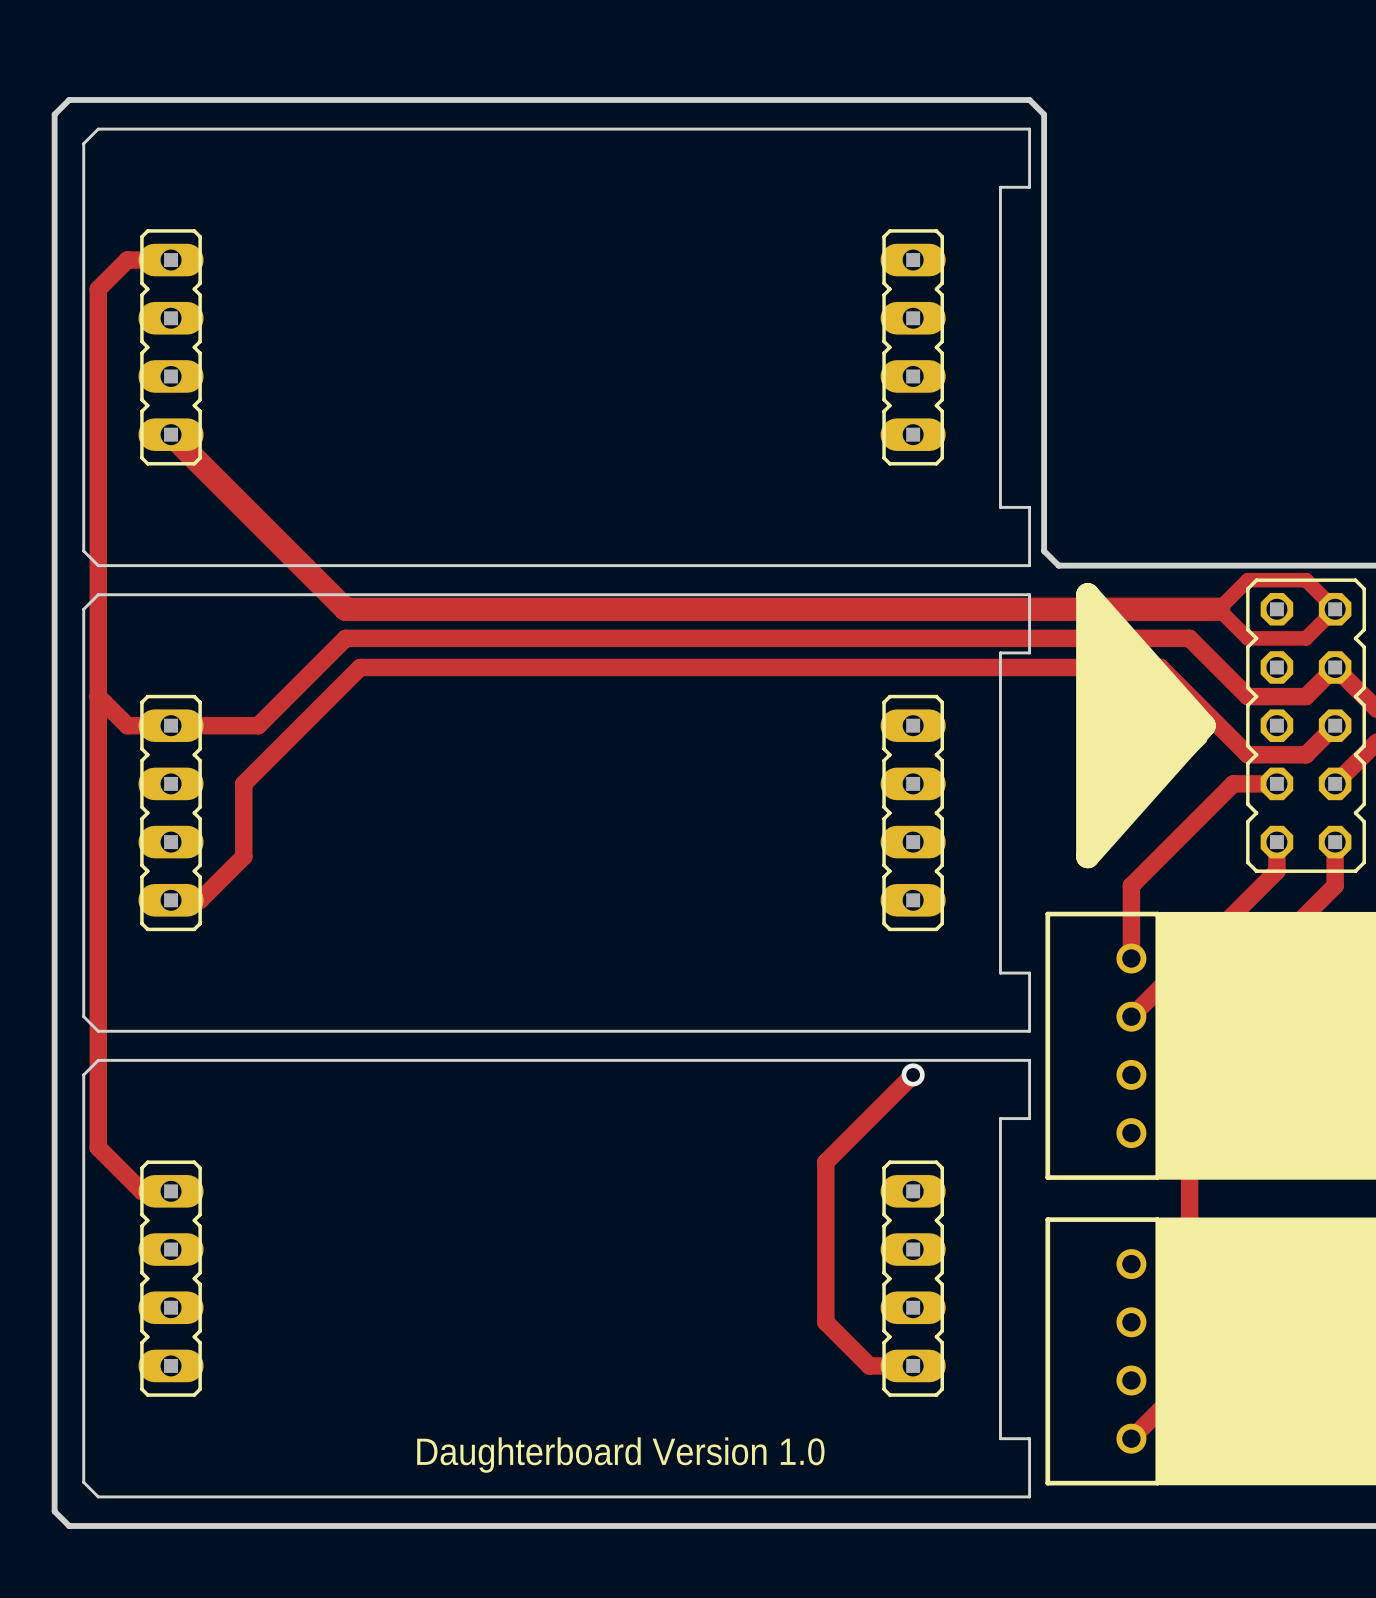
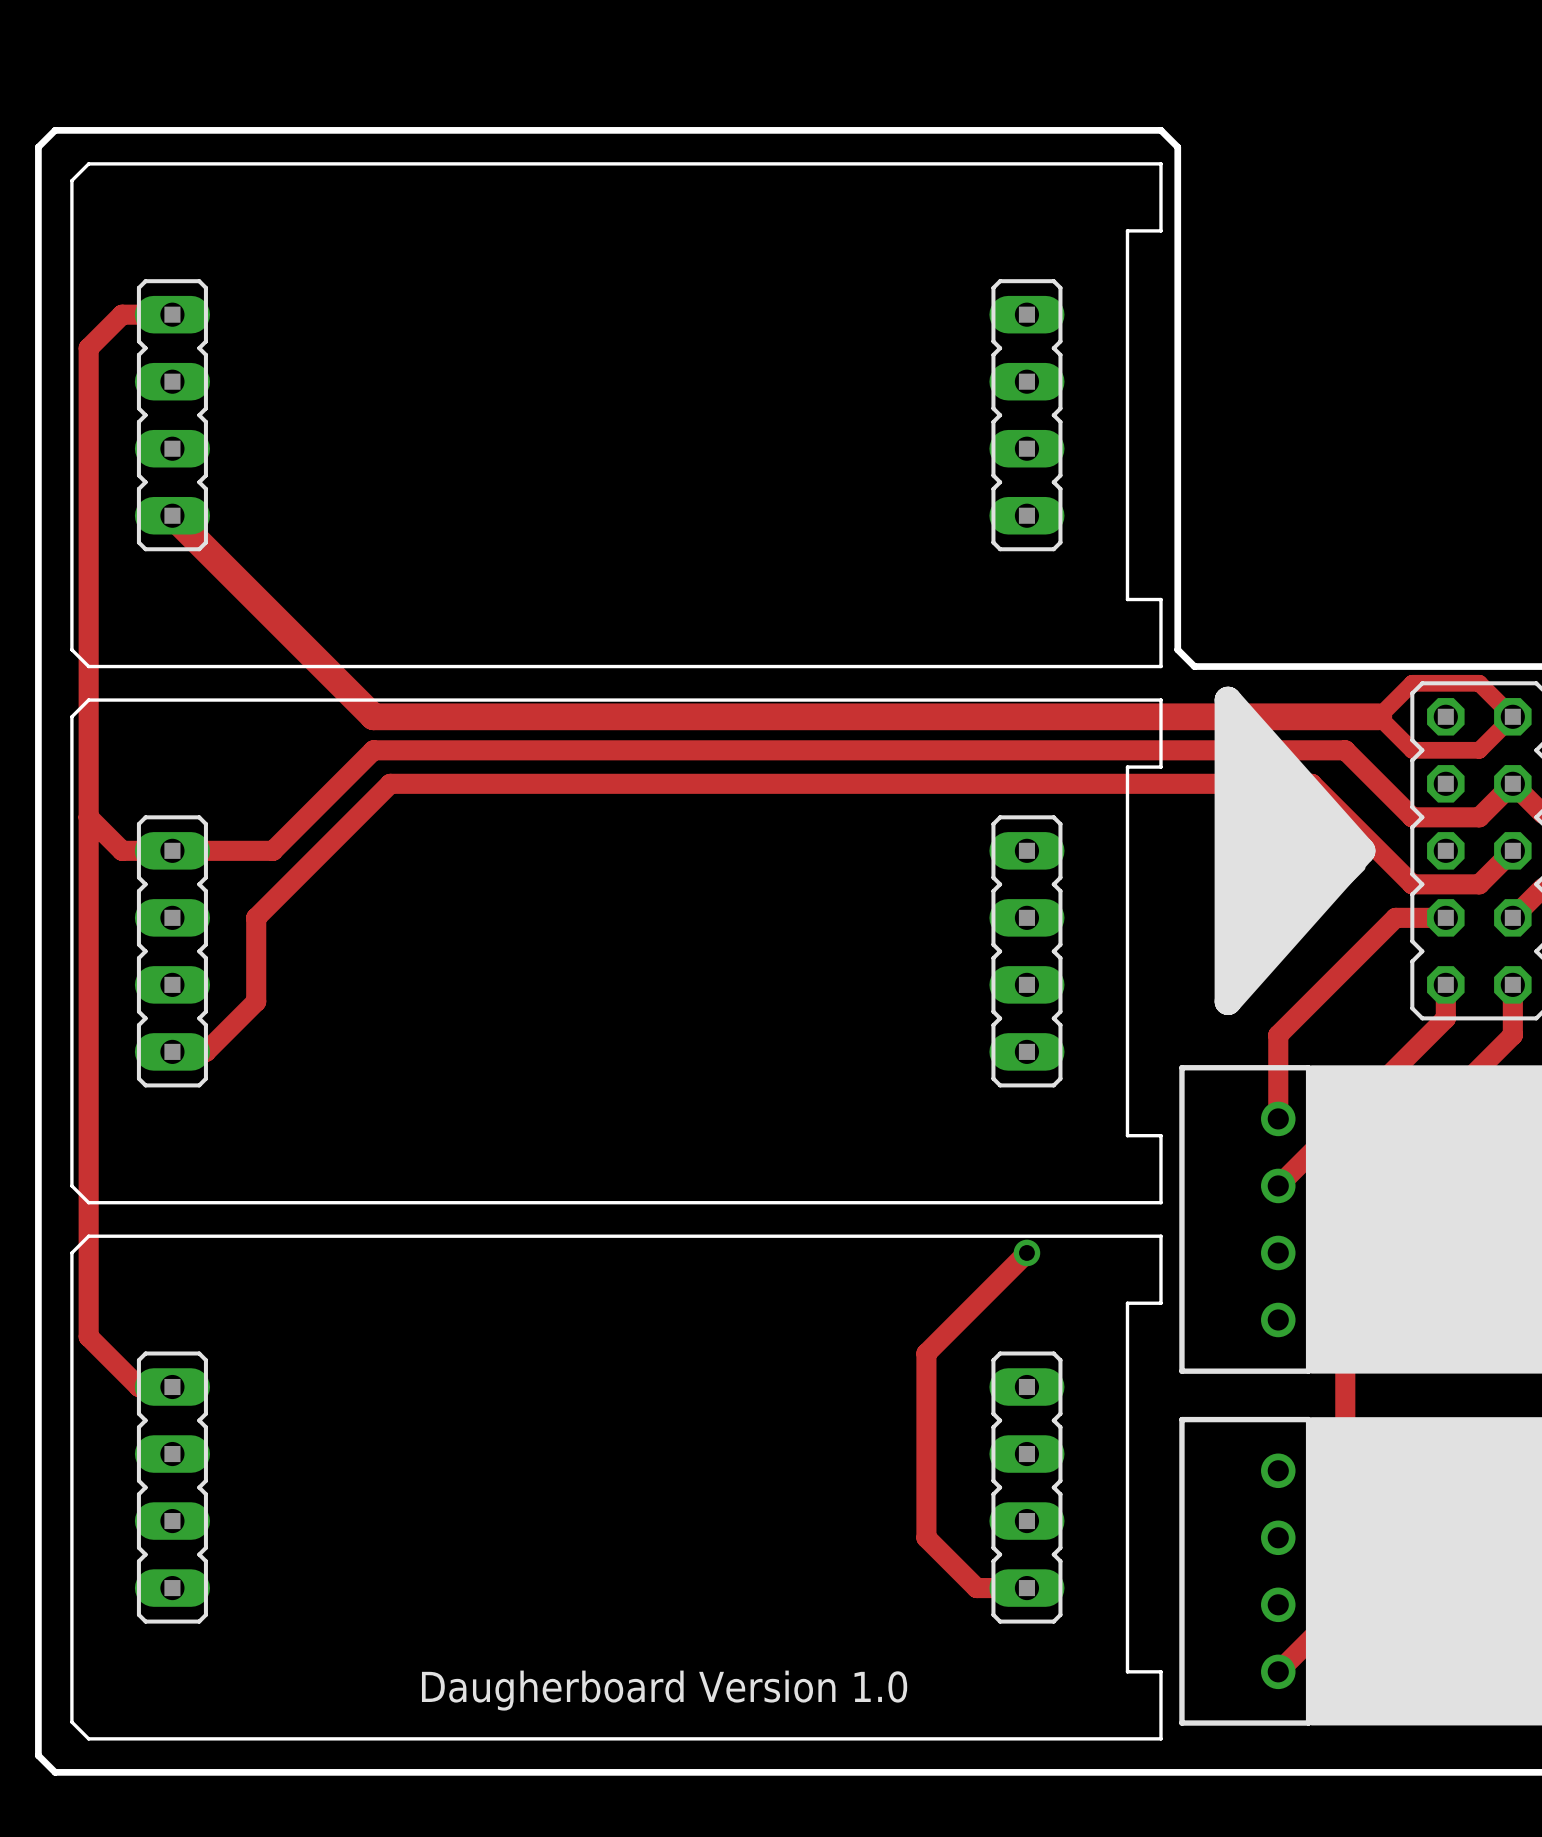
text: Daughterboard Version 1.0 (620, 1455) -> Daugherboard Version 1.0 (664, 1690)

